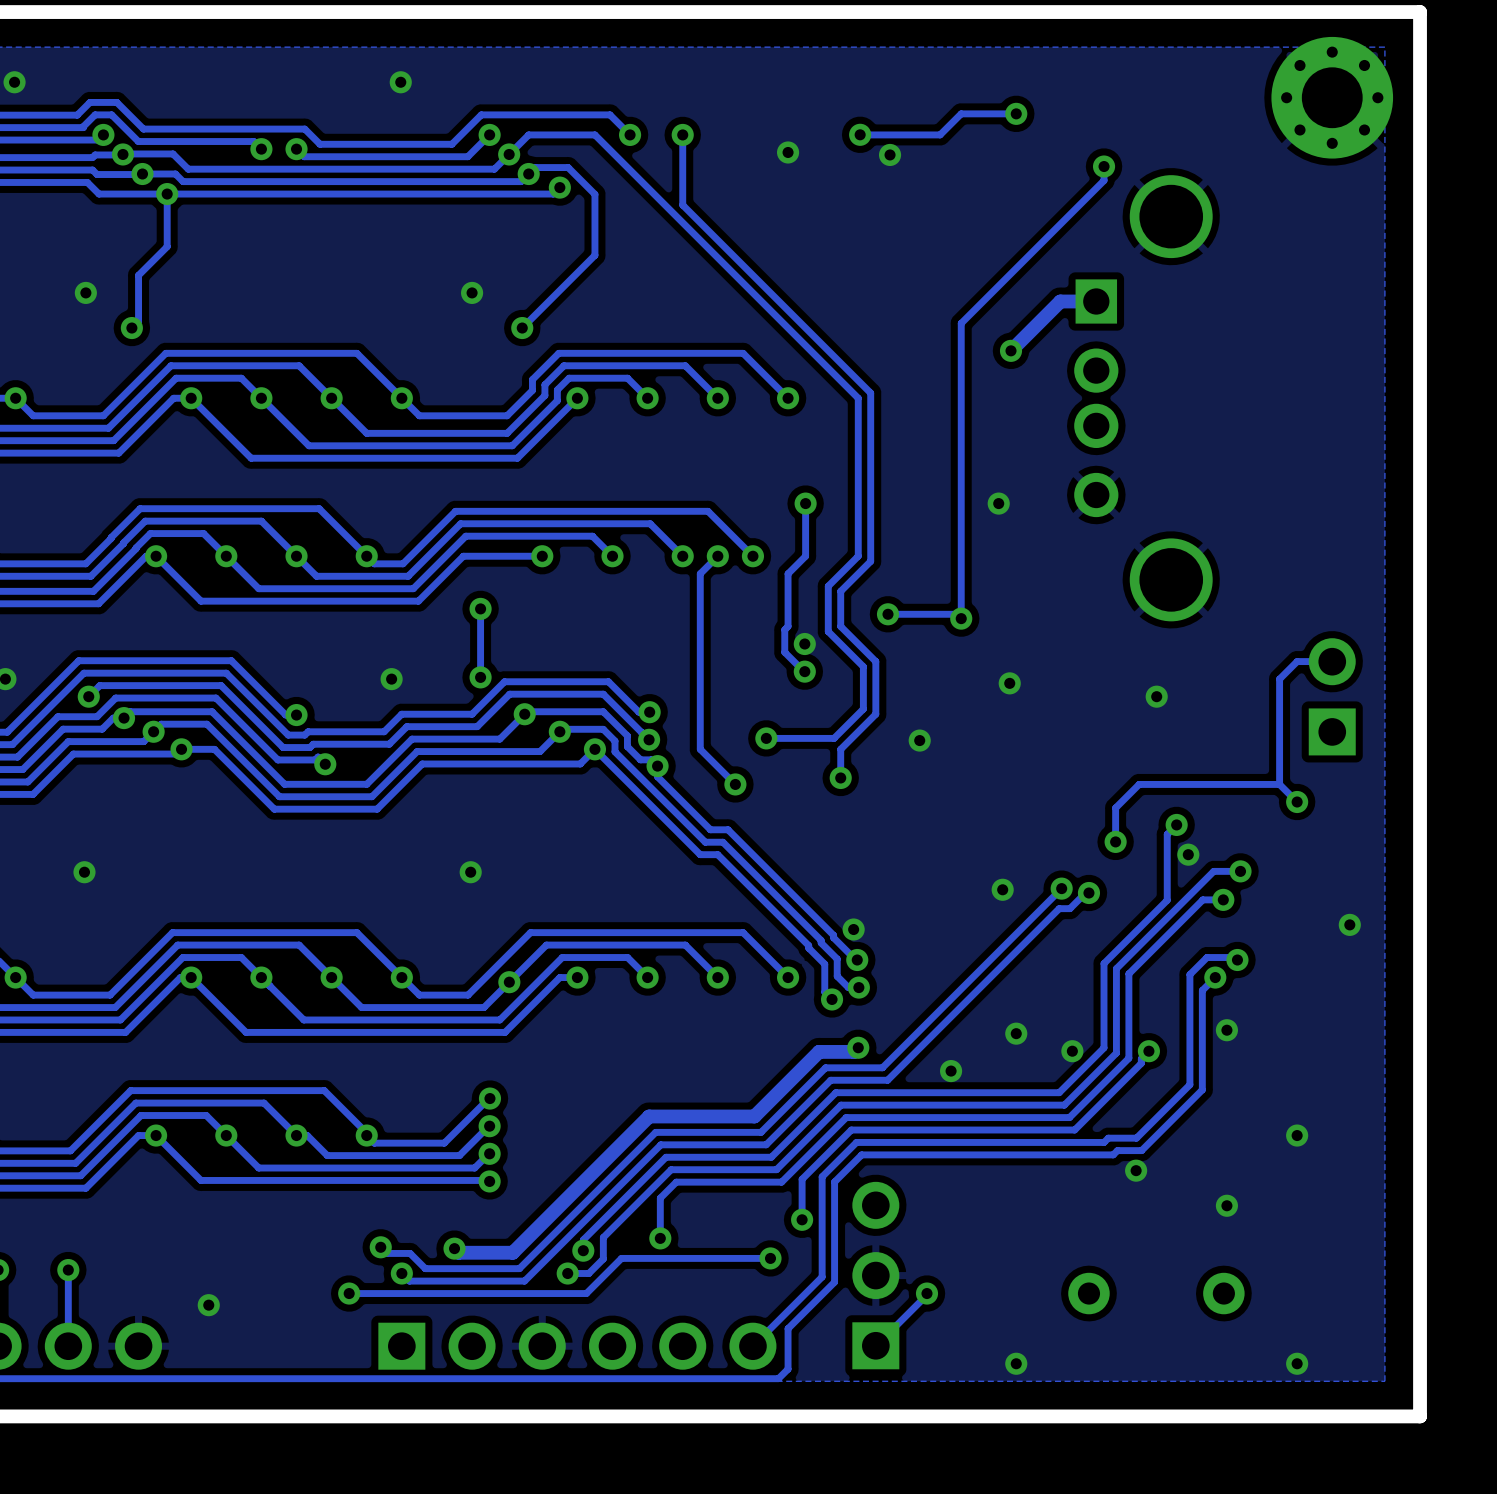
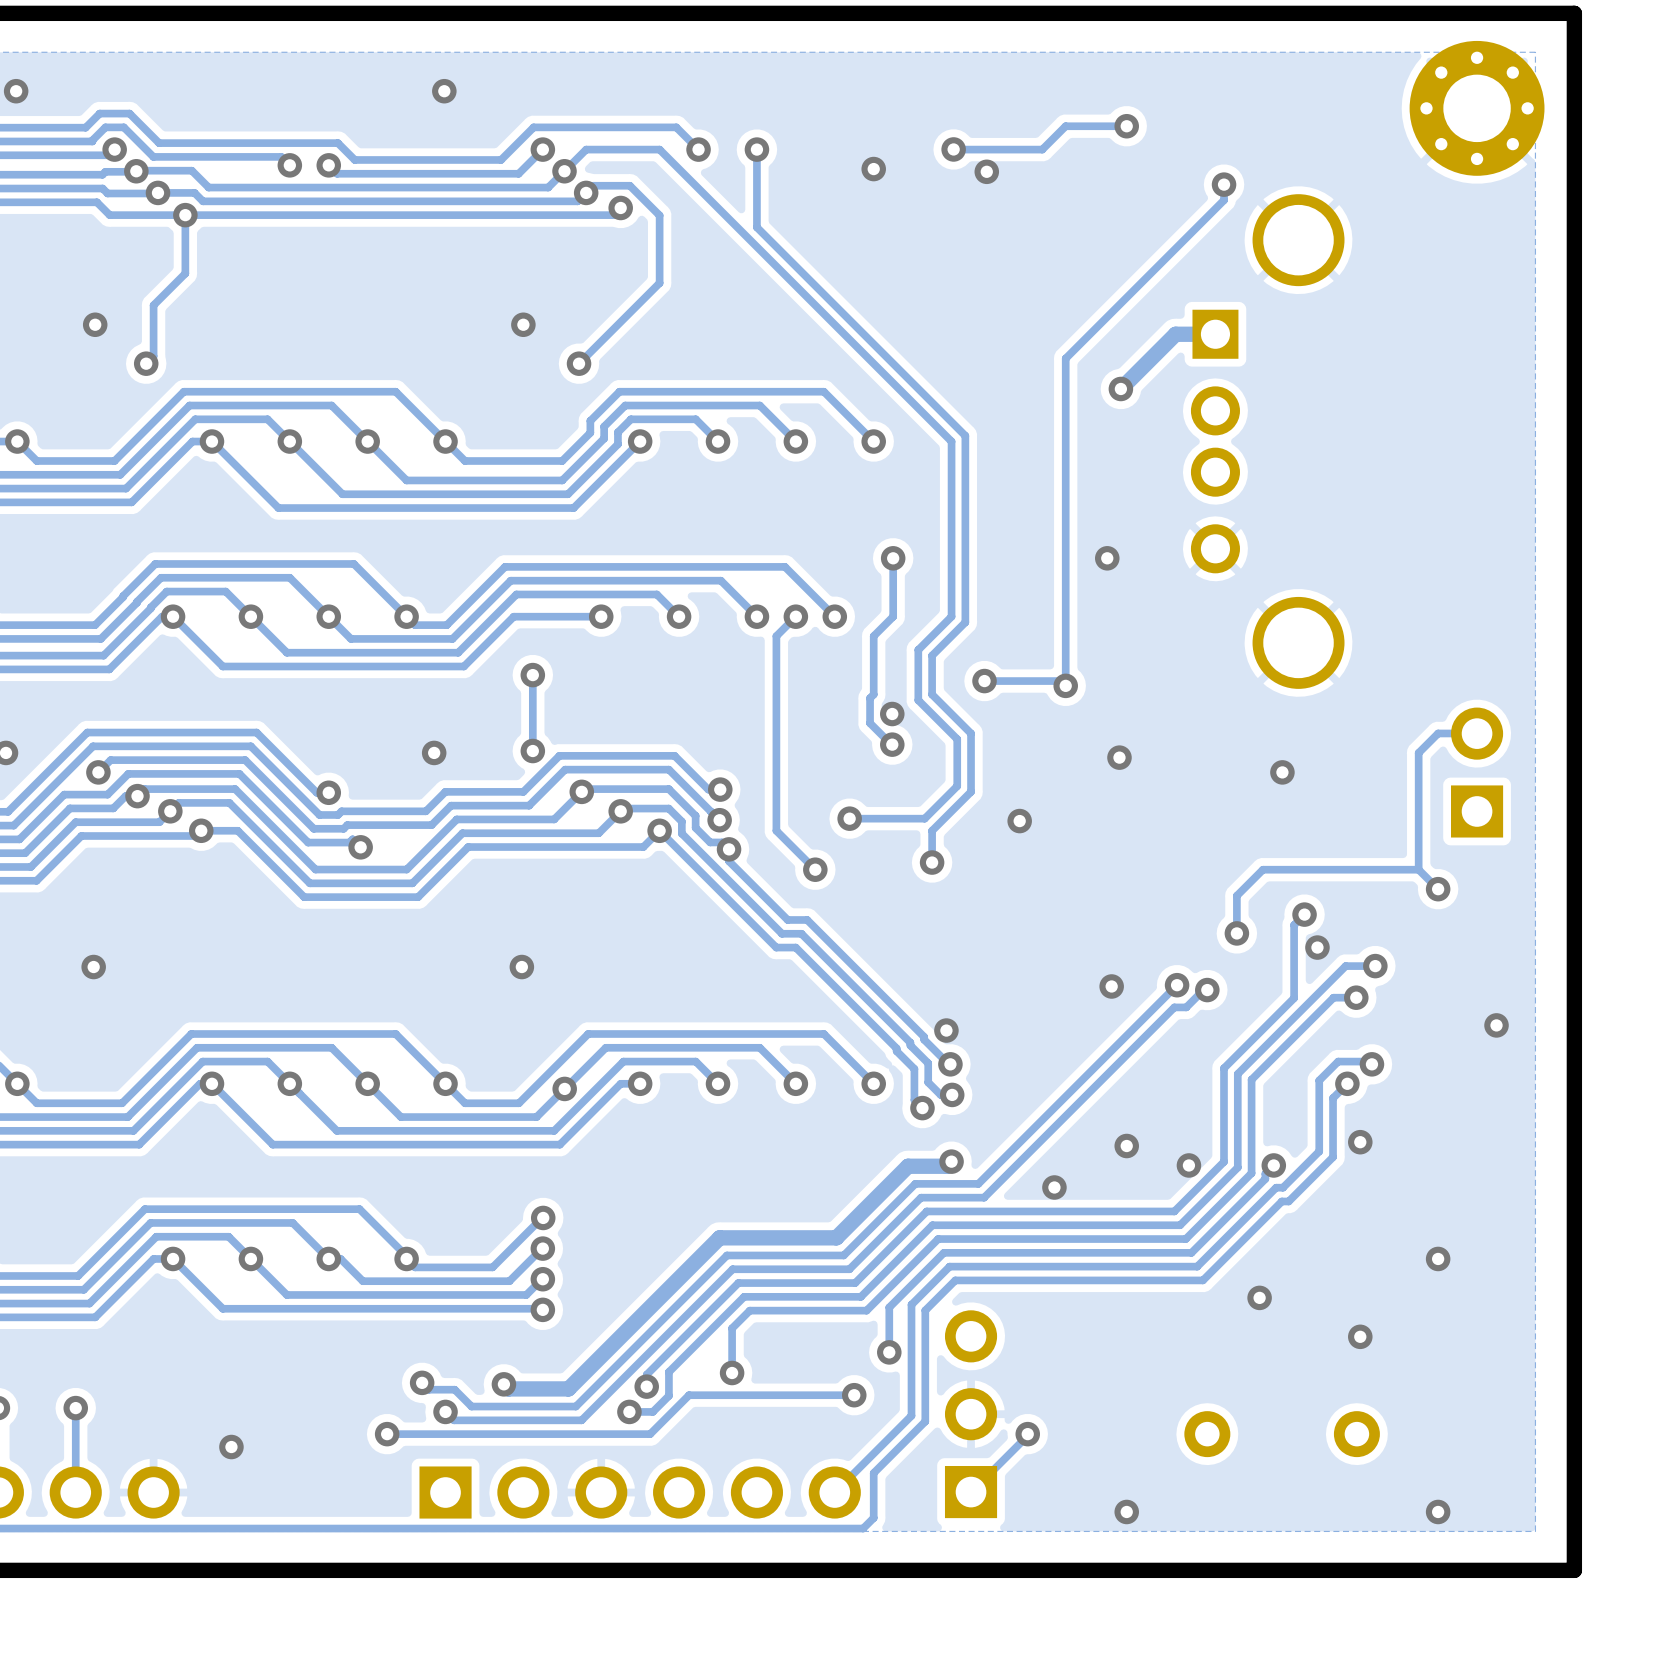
track: (1189, 1038) (1189, 1084) (1136, 1138) (1108, 1138) (1104, 1142) (1079, 1142) -> (1319, 1151) (1282, 1187) (1276, 1187) (1197, 1266)
track: (1202, 1043) (1202, 1089) (1141, 1150) (1117, 1150) (1113, 1154) (1085, 1154) -> (1333, 1157) (1288, 1201) (1281, 1201) (1202, 1280)

